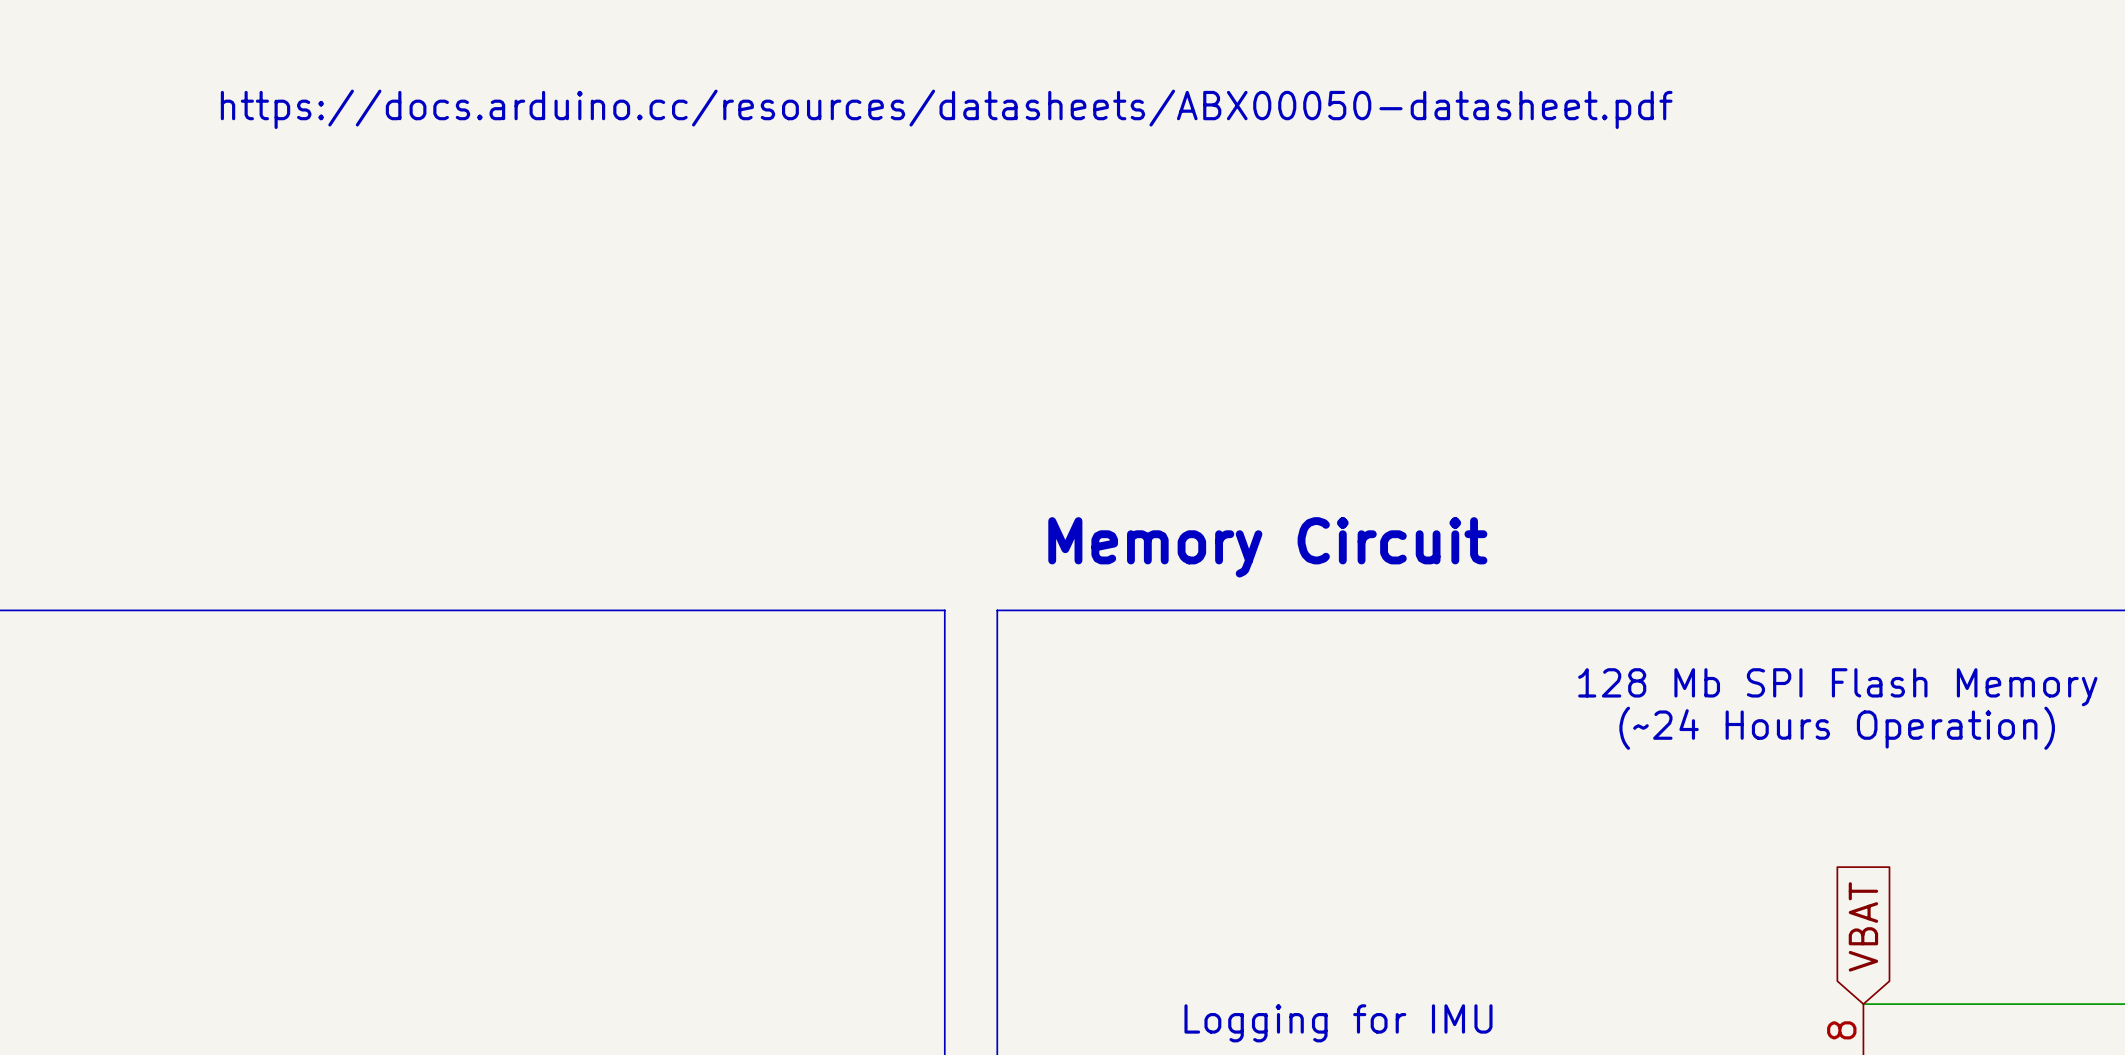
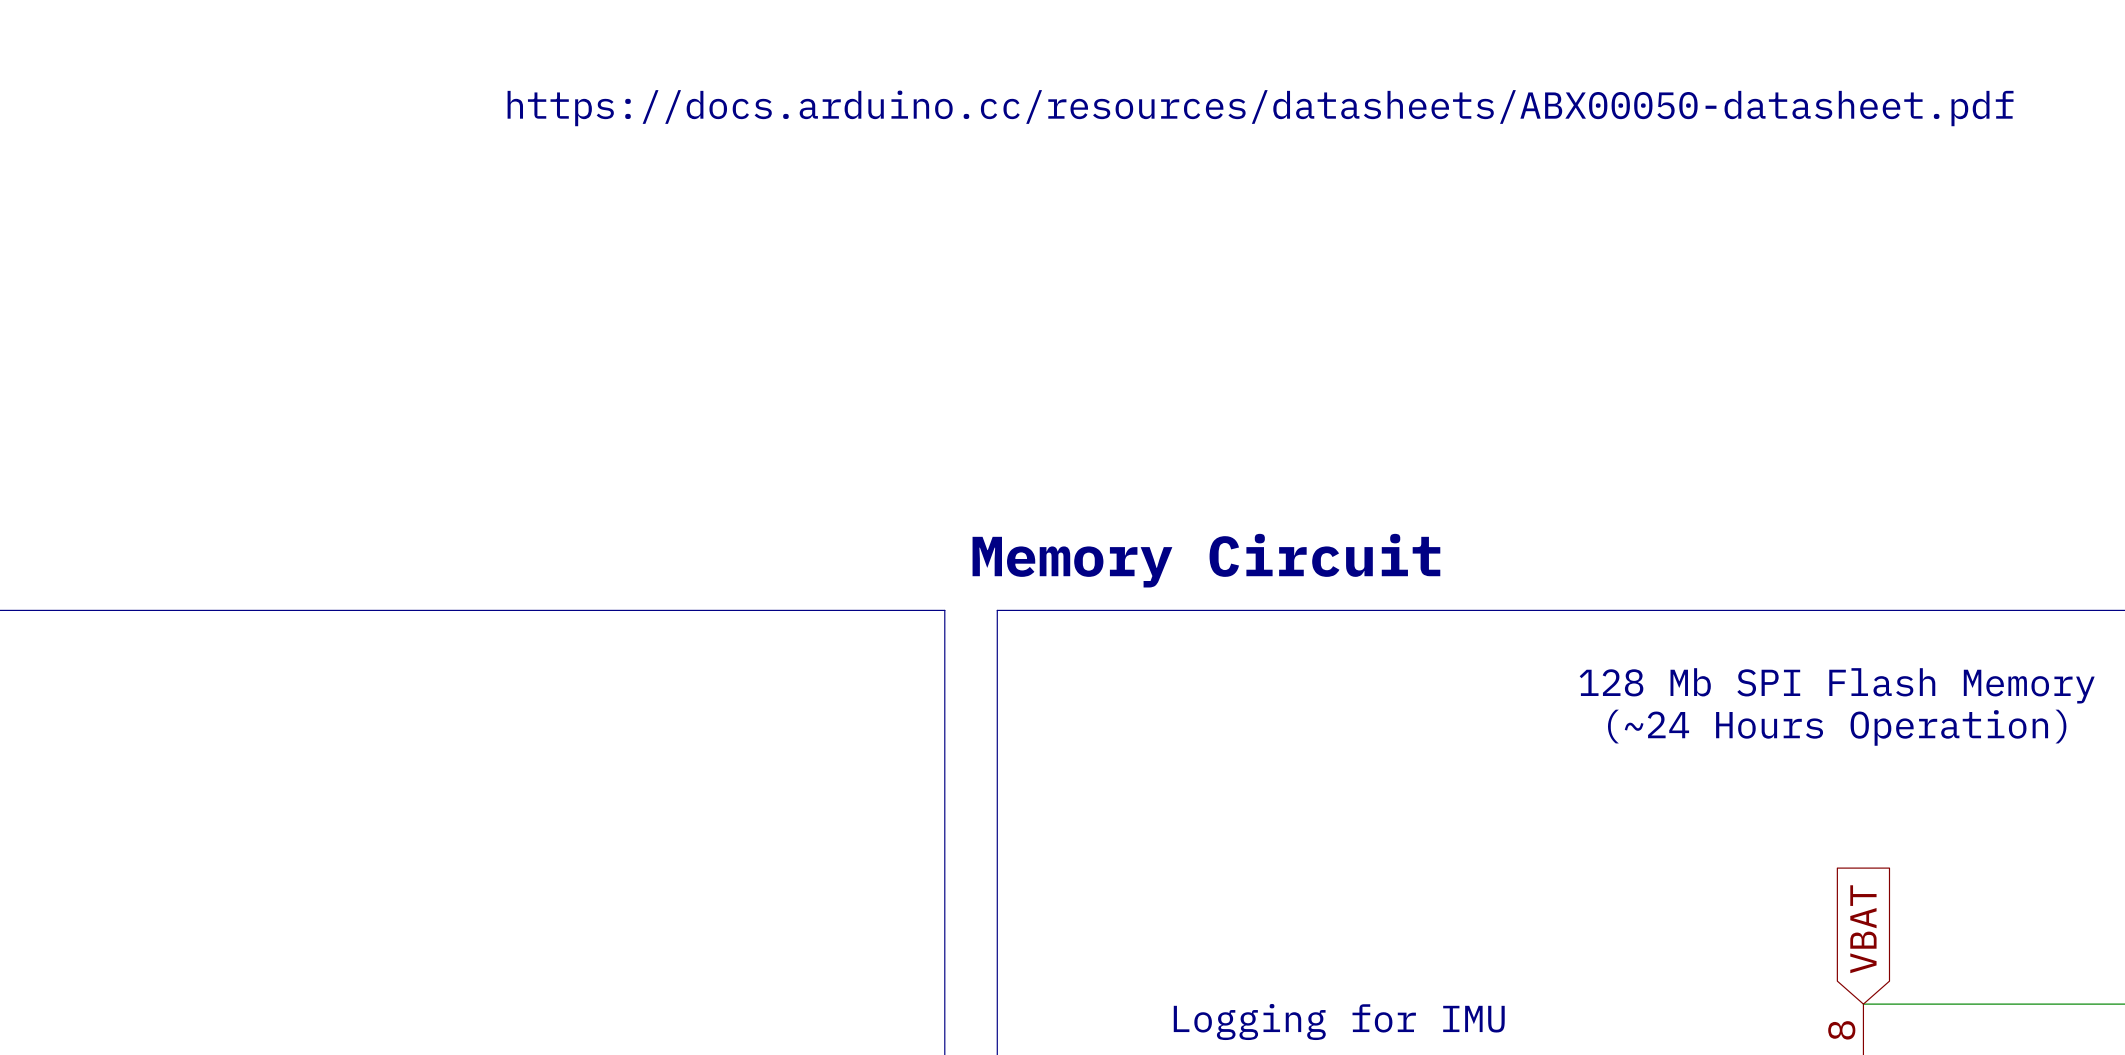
text position: https://docs.arduino.cc/resources/datasheets/ABX00050-datasheet.pdf (946, 109) -> https://docs.arduino.cc/resources/datasheets/ABX00050-datasheet.pdf (1260, 108)
text position: Memory Circuit (1267, 547) -> Memory Circuit (1206, 560)

